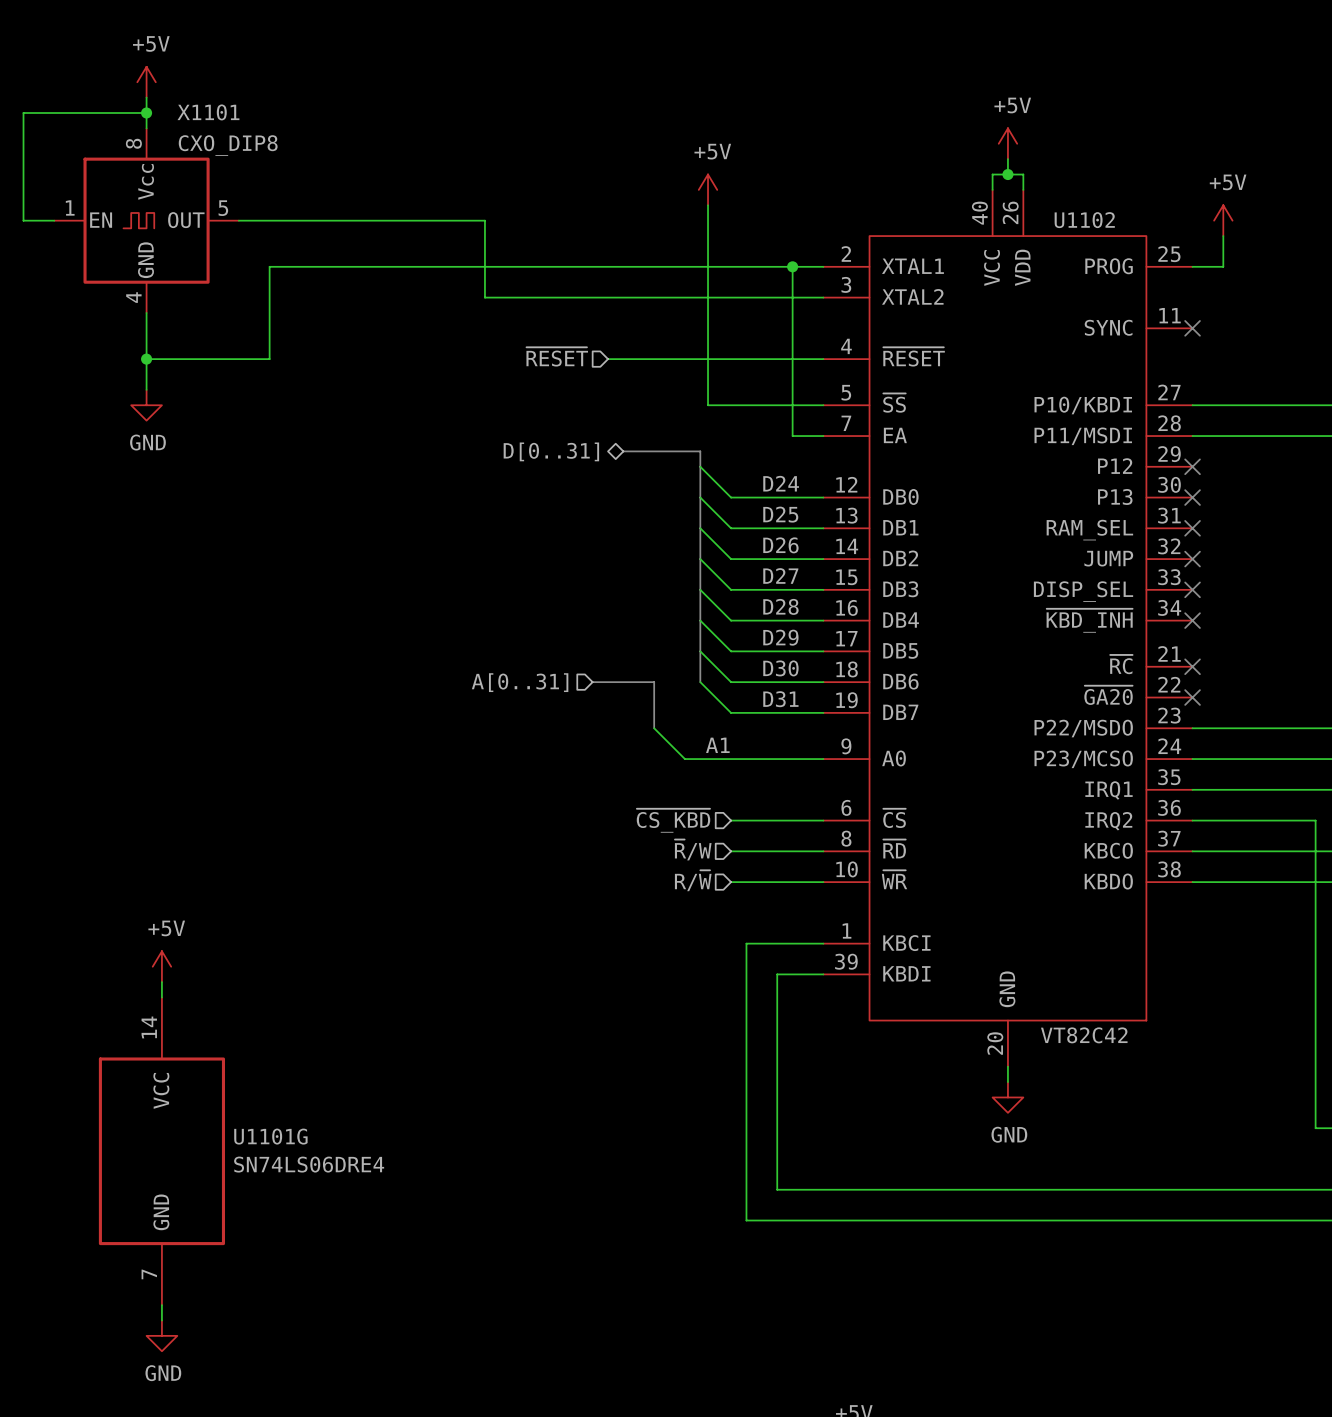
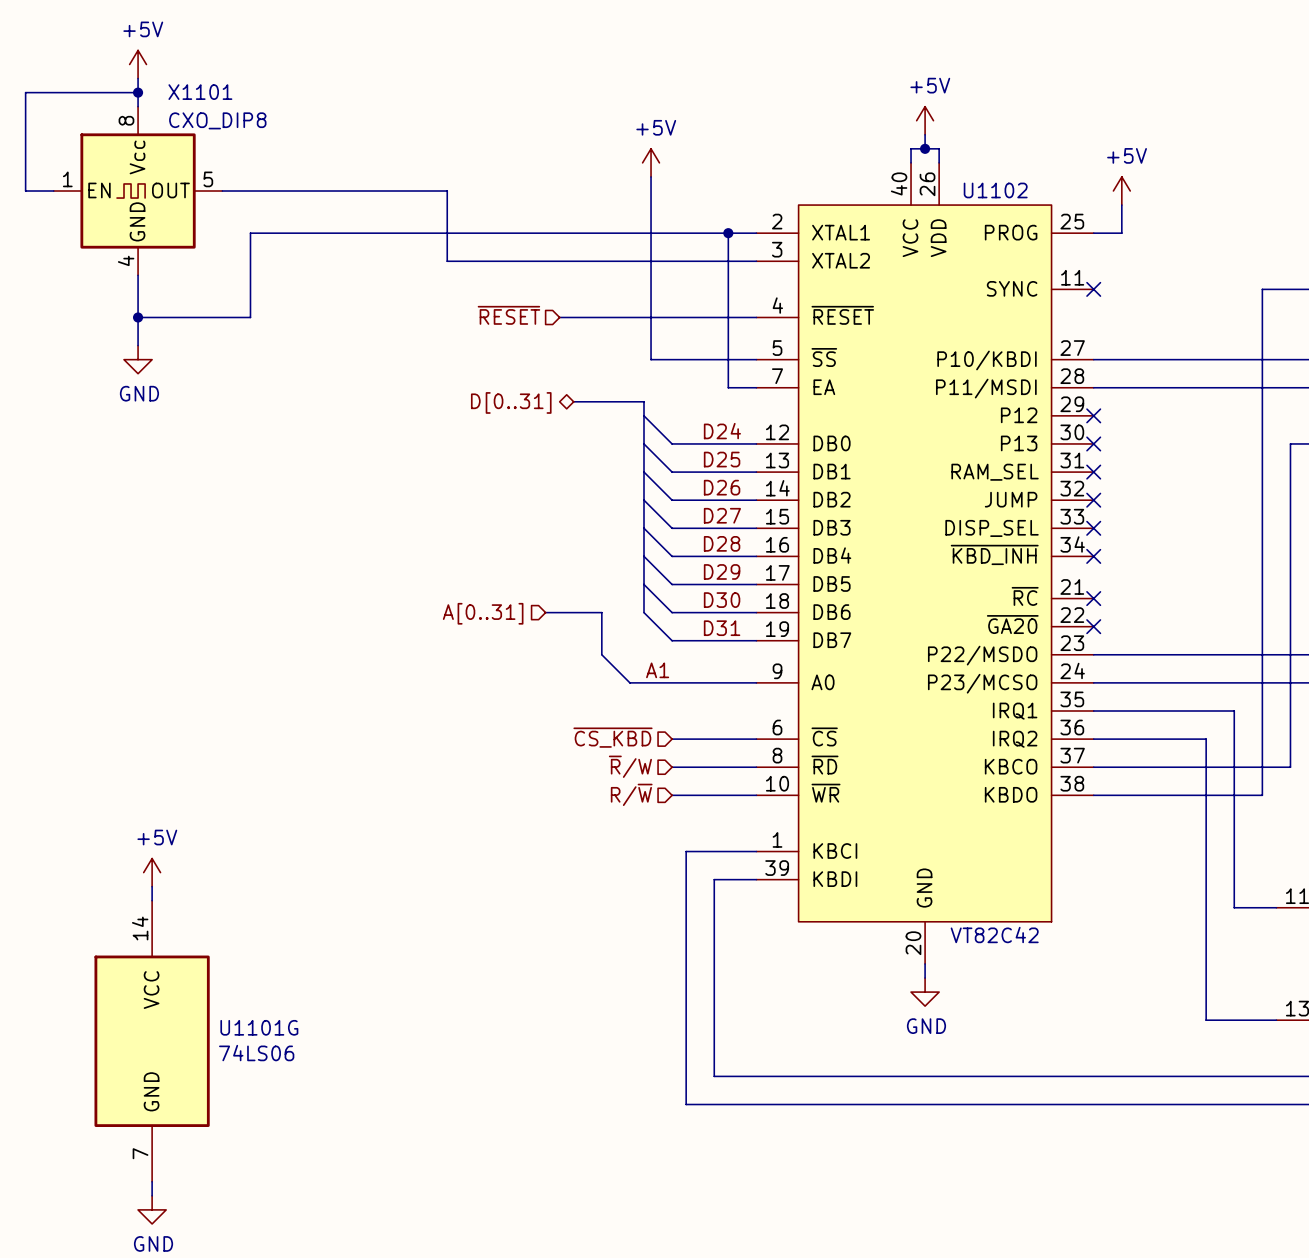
U1101G value: SN74LS06DRE4 (309, 1164) -> 74LS06 (256, 1053)

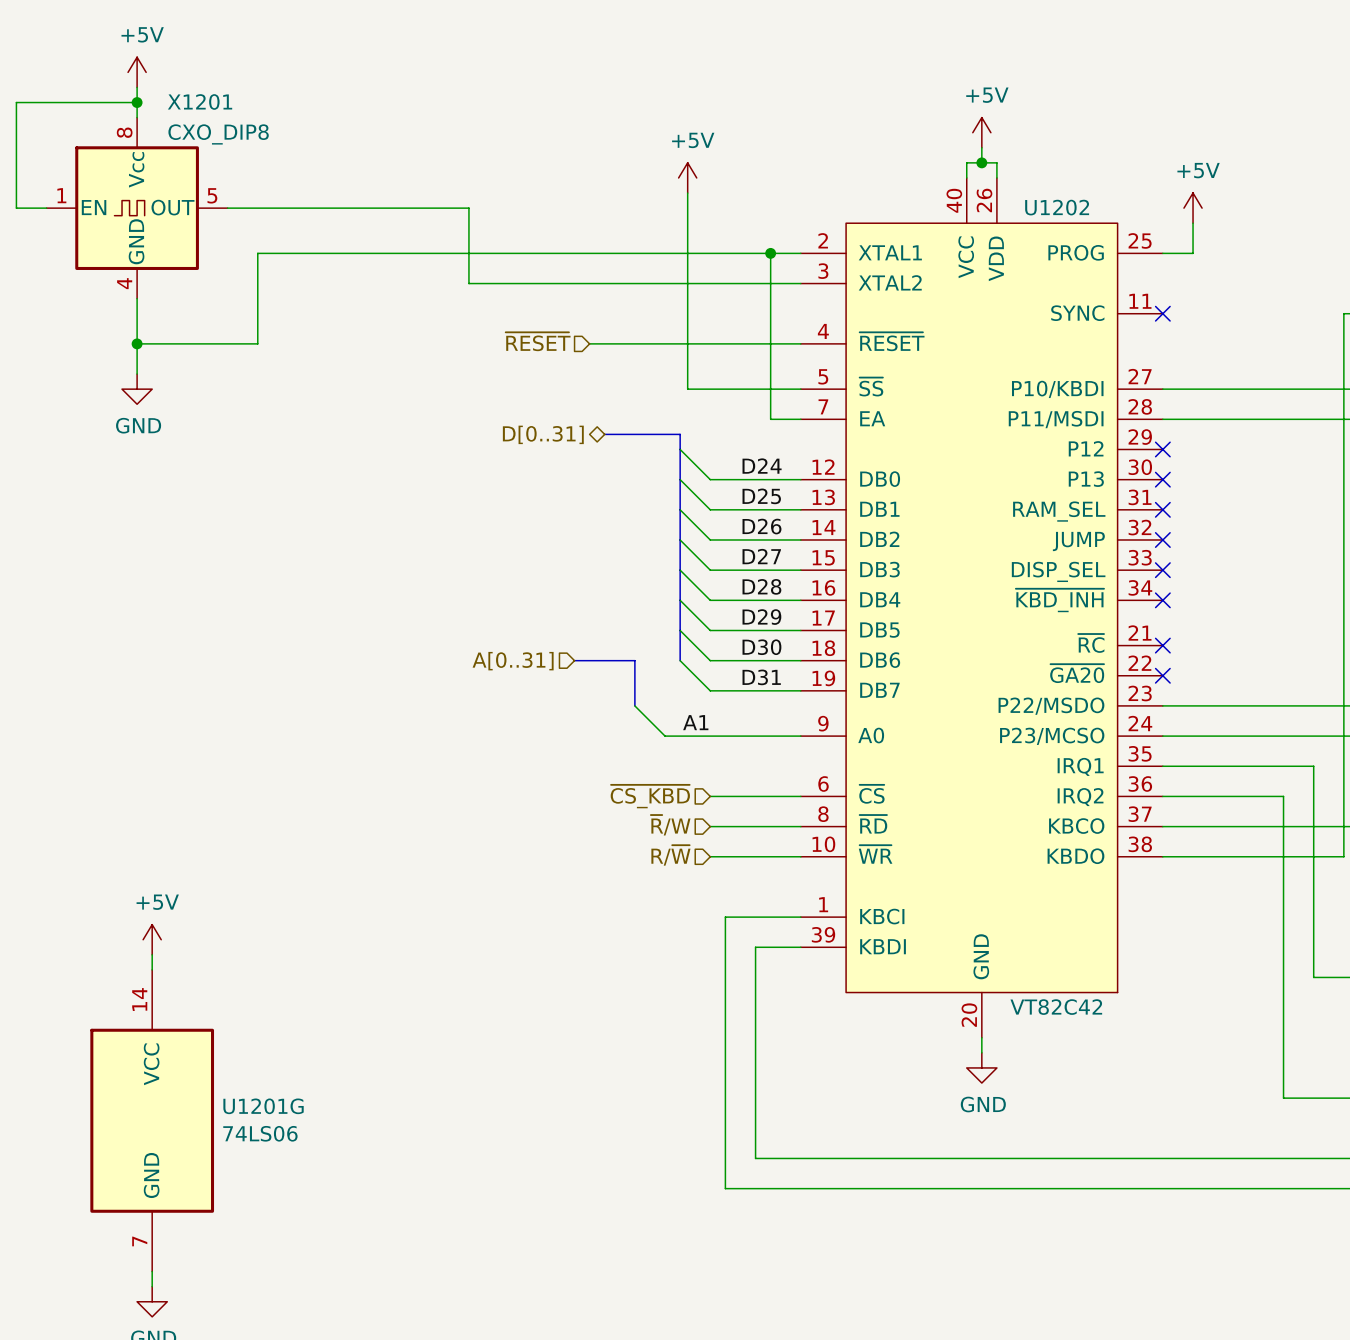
X1101 name: X1101 (200, 92) -> X1201 (200, 101)
U1102 name: U1102 (995, 190) -> U1202 (1057, 207)
U1101G name: U1101G (259, 1027) -> U1201G (263, 1106)

